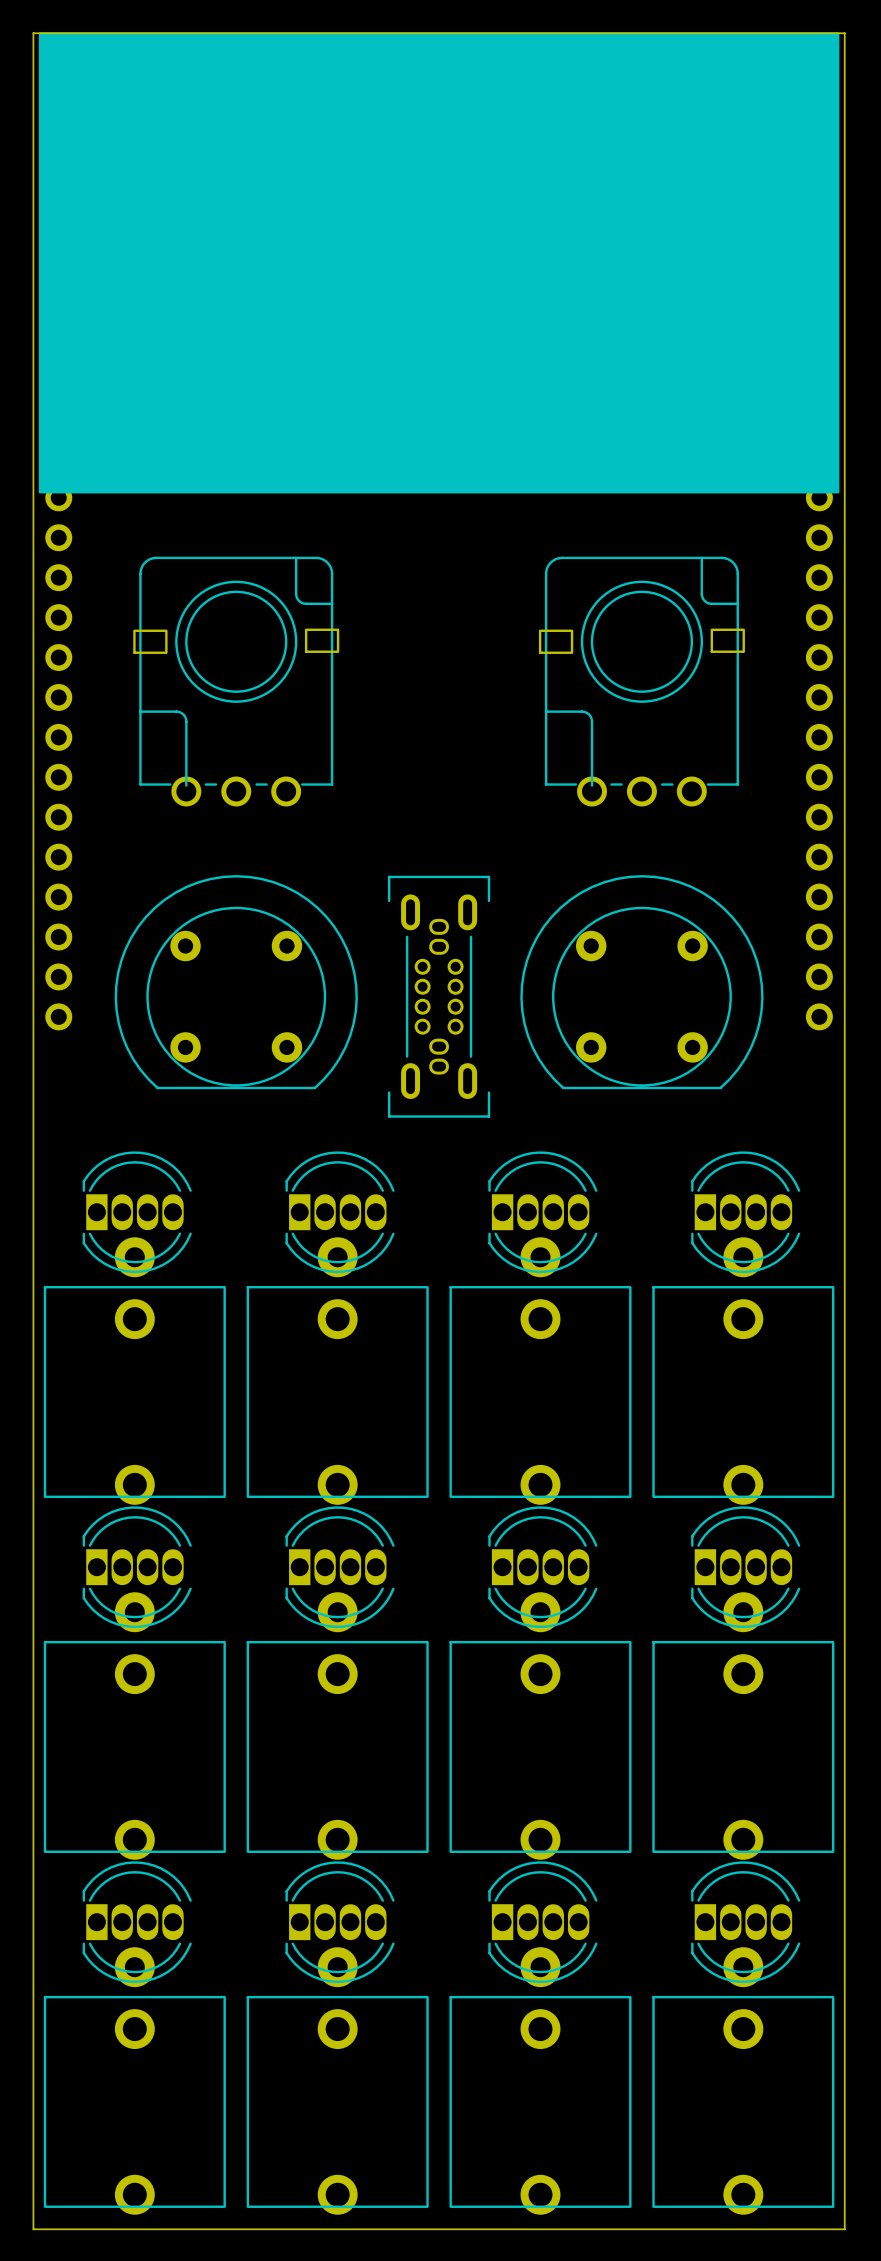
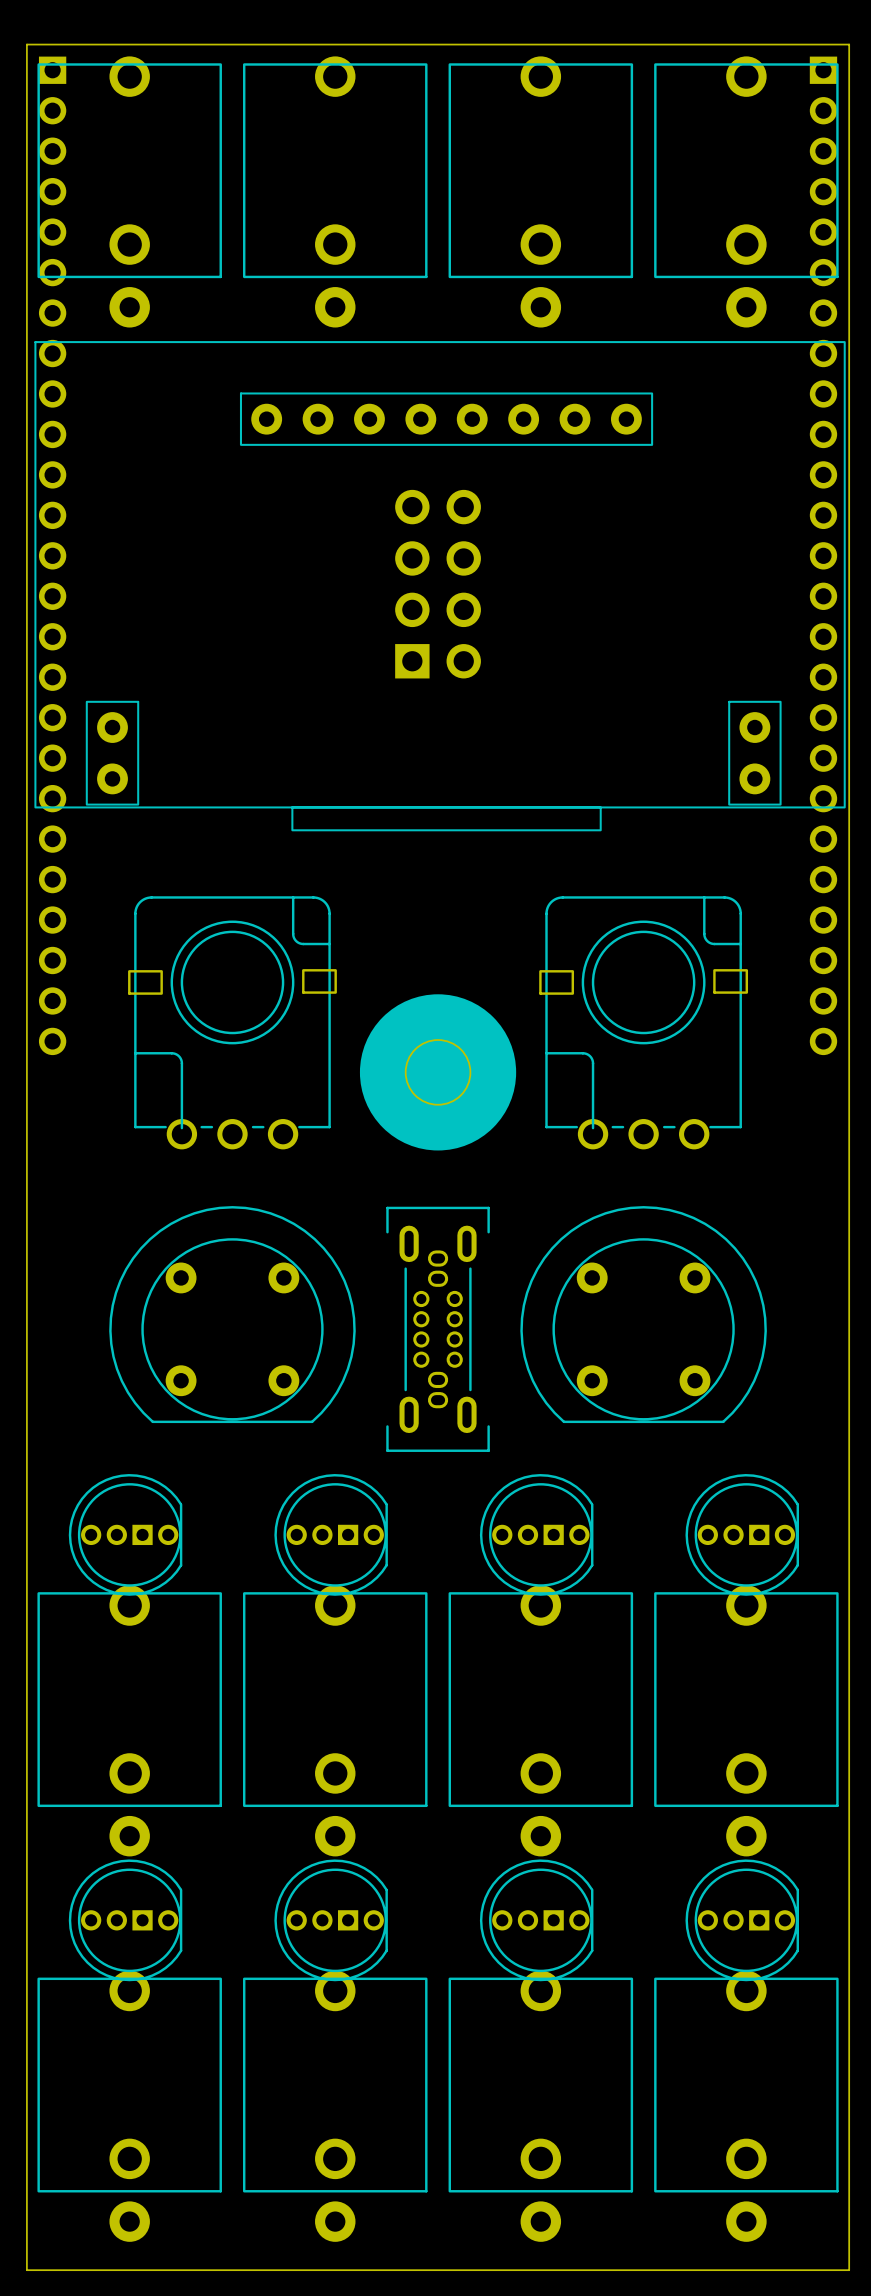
drawing: [38, 32, 840, 494] -> none
part: none -> (129, 191)
part: none -> (335, 191)
part: none -> (540, 191)
part: none -> (746, 191)
part: none -> (438, 584)
part: none -> (440, 586)
part: (236, 681) -> none
part: (641, 681) -> none
part footprint: [114, 875, 358, 1090] -> [128, 896, 337, 1150]
part footprint: [520, 875, 764, 1090] -> [539, 896, 749, 1150]
drawing: none -> [359, 994, 517, 1151]
part position: (439, 996) -> (438, 1329)
round board edge: none -> [405, 1039, 471, 1106]
part: (137, 1212) -> none
part: (340, 1212) -> none
part: (542, 1212) -> none
part: (745, 1212) -> none
part: none -> (232, 1314)
part: none -> (643, 1314)
part: (134, 1371) -> none
part: (337, 1371) -> none
part: (540, 1371) -> none
part: (743, 1371) -> none
part: none -> (125, 1534)
part: none -> (331, 1534)
part: none -> (536, 1534)
part: none -> (742, 1534)
part: (137, 1567) -> none
part: (340, 1567) -> none
part: (542, 1567) -> none
part: (745, 1567) -> none
part rotation: 0° (134, 1726) -> 180° (129, 1720)
part rotation: 0° (337, 1726) -> 180° (335, 1720)
part rotation: 0° (540, 1726) -> 180° (540, 1720)
part rotation: 0° (743, 1726) -> 180° (746, 1720)
part: none -> (125, 1920)
part: none -> (331, 1920)
part: none -> (536, 1920)
part: none -> (742, 1920)
part: (137, 1922) -> none
part: (340, 1922) -> none
part: (542, 1922) -> none
part: (745, 1922) -> none
part rotation: 0° (134, 2080) -> 180° (129, 2106)
part rotation: 0° (337, 2080) -> 180° (335, 2106)
part rotation: 0° (540, 2080) -> 180° (540, 2106)
part rotation: 0° (743, 2080) -> 180° (746, 2106)

